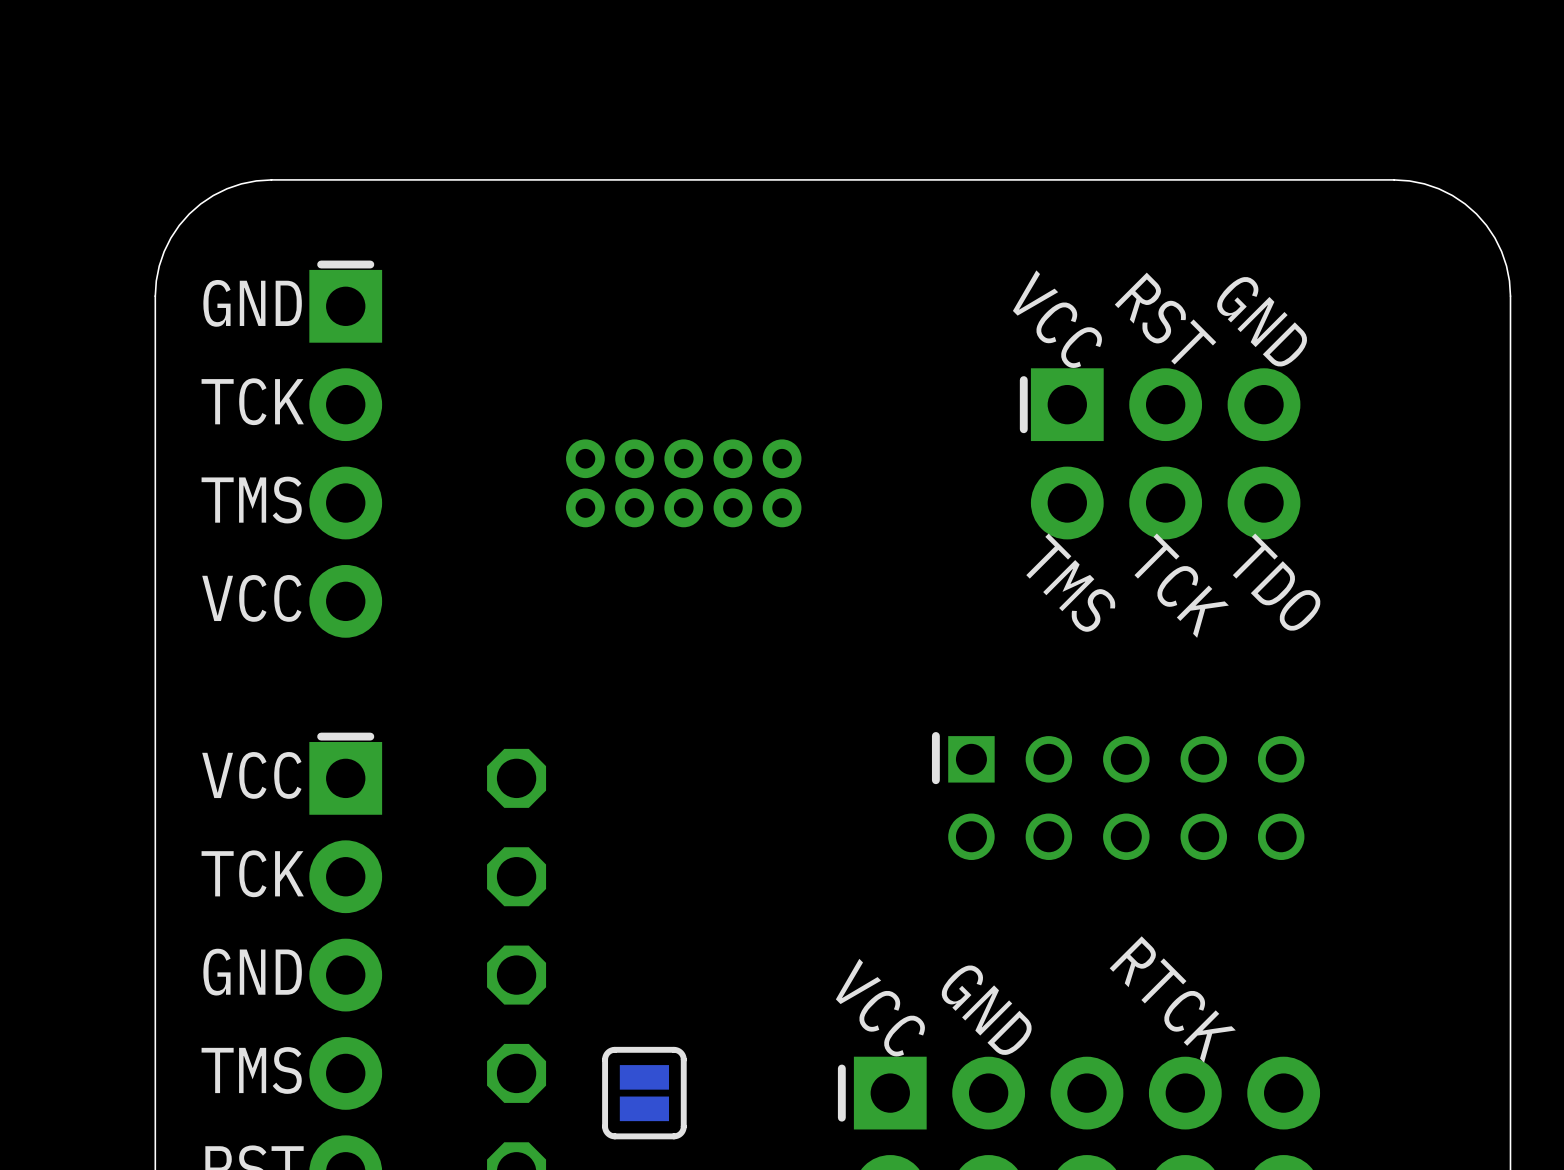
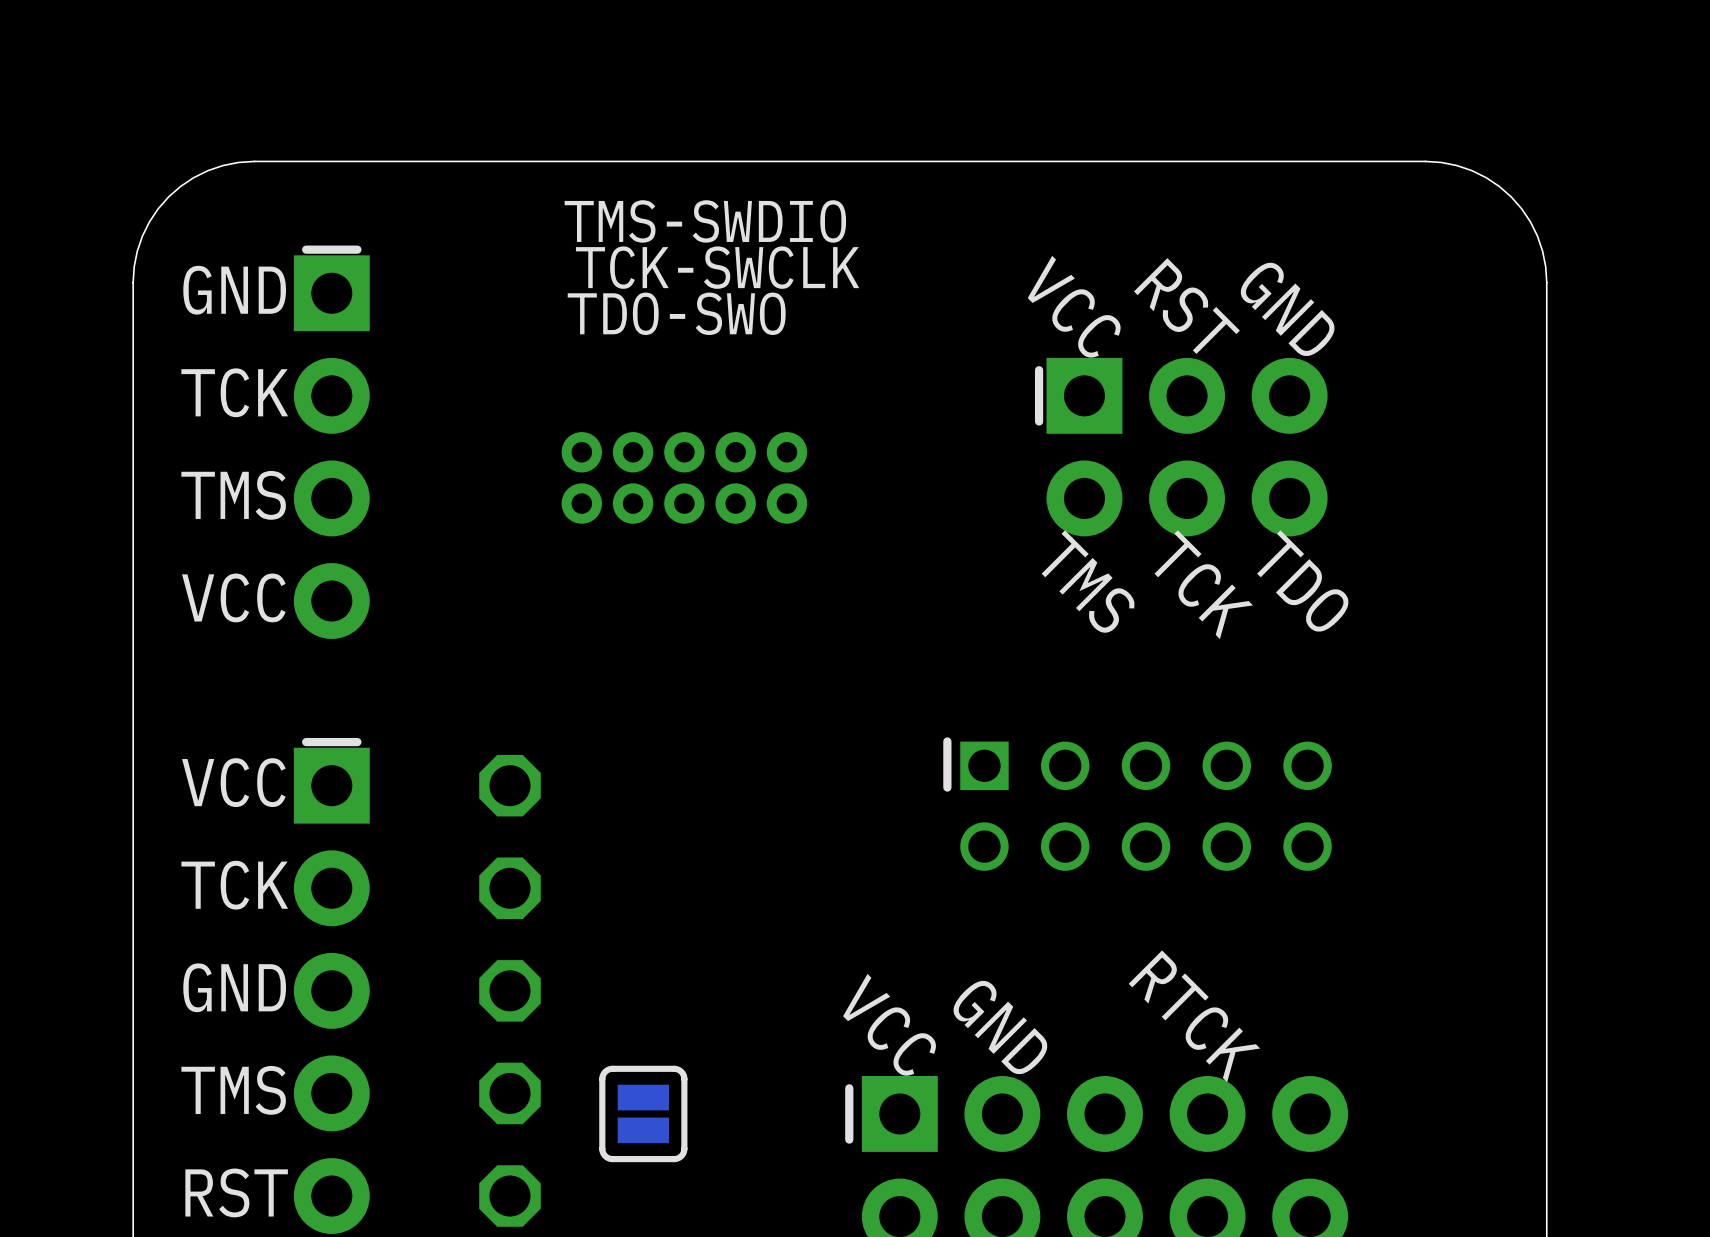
text: none -> TMS-SWDIO (705, 221)
text: none -> TCK-SWCLK (717, 267)
text: none -> TDO-SWO (676, 313)

